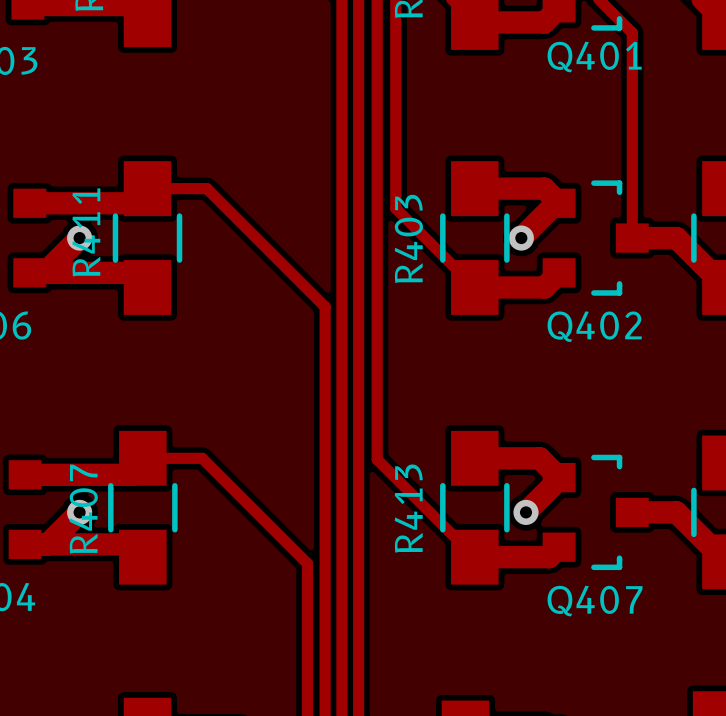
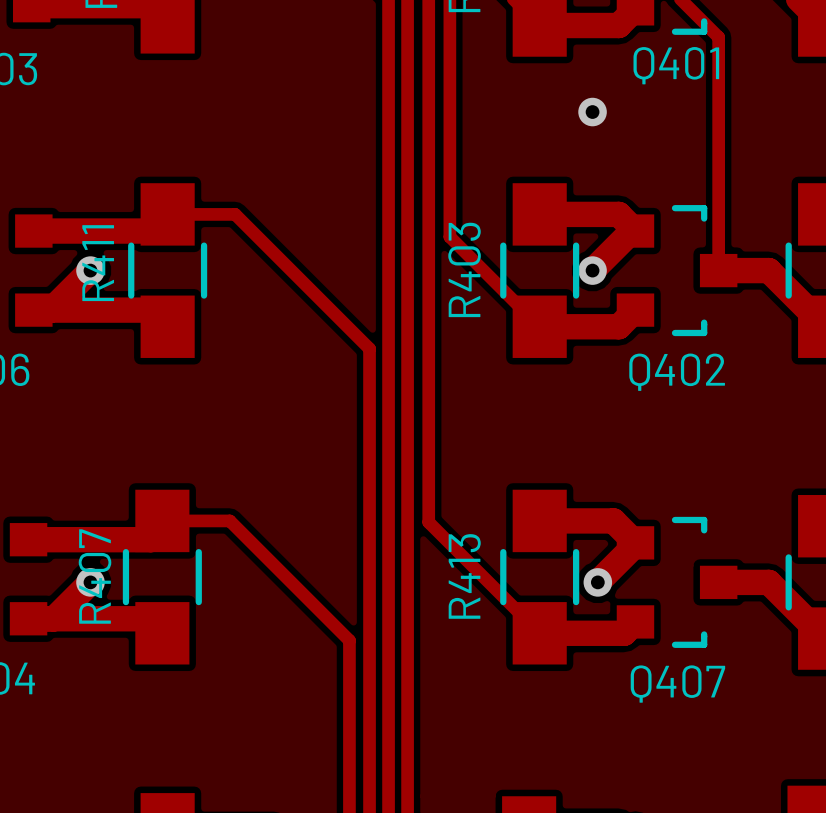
via: none -> (592, 112)

